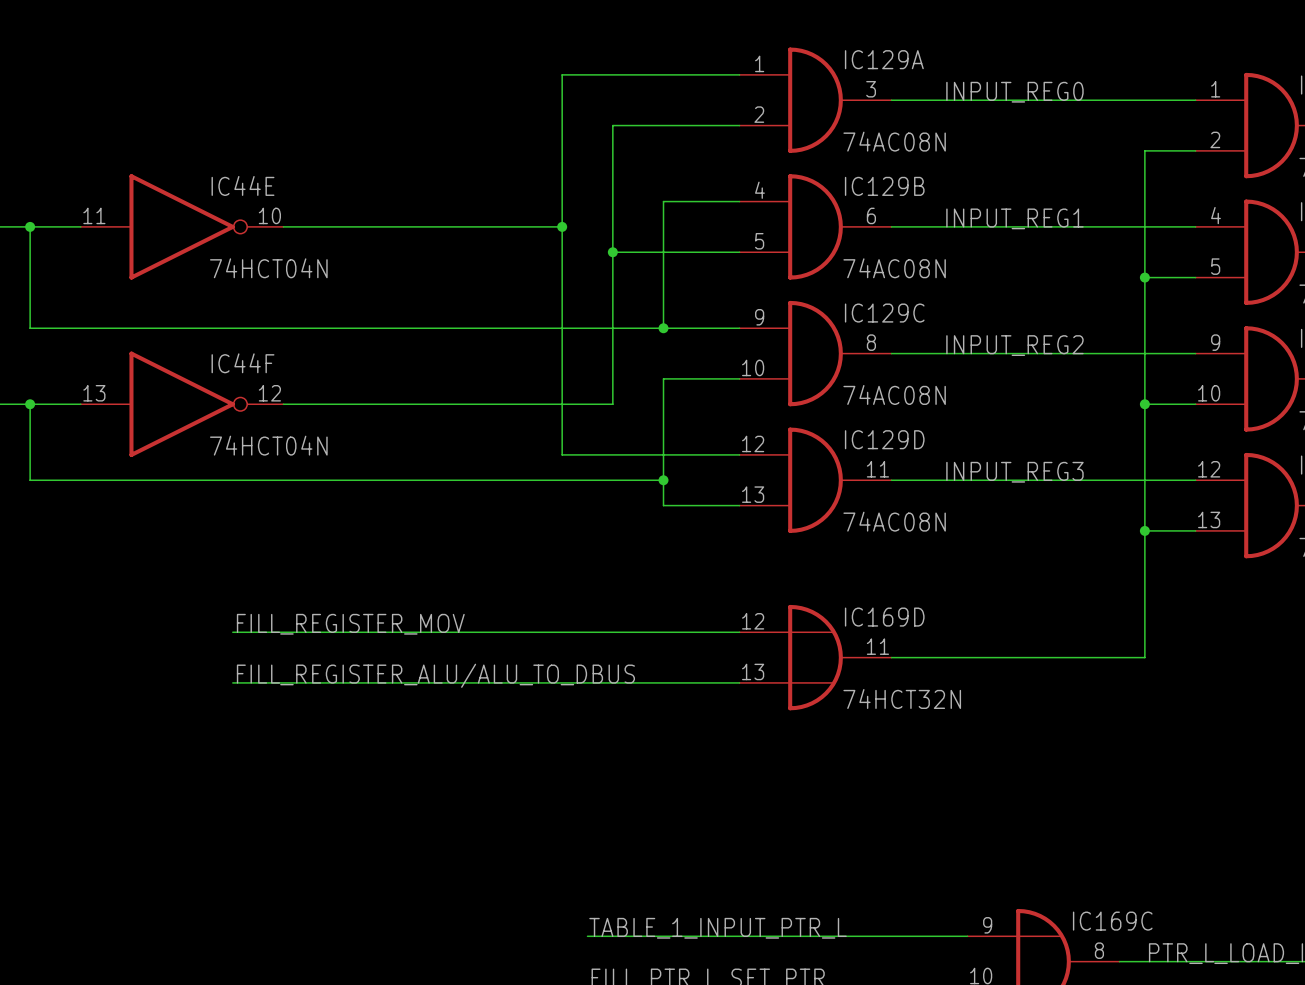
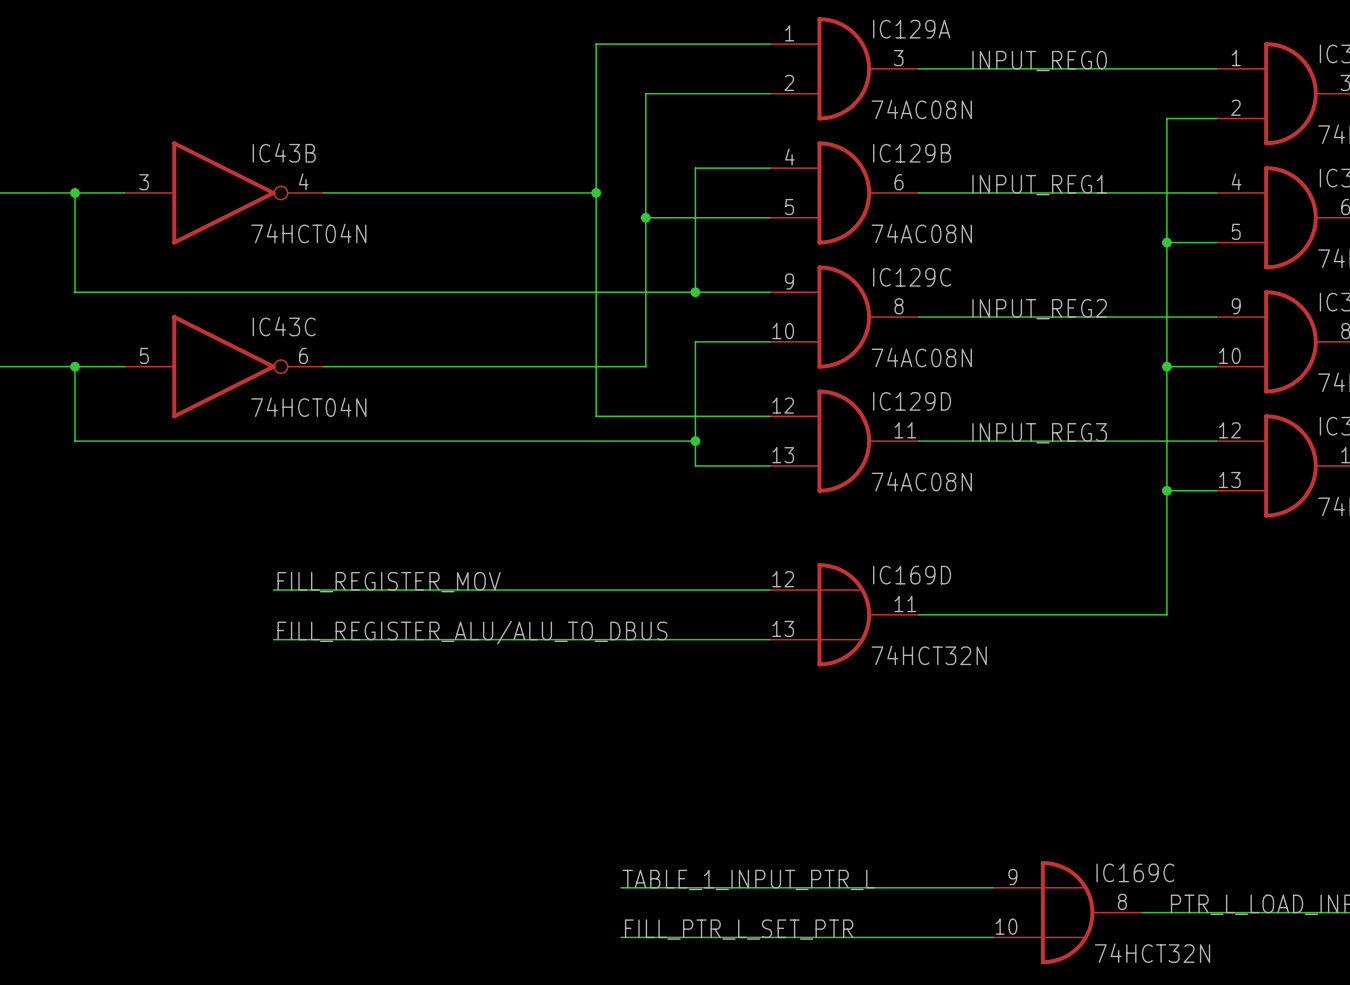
IC44E name: IC44E (242, 185) -> IC43B (284, 152)
IC44E pin number: 11 (94, 215) -> 3 (144, 182)
IC44E pin number: 10 (269, 215) -> 4 (303, 181)
IC44F name: IC44F (242, 363) -> IC43C (284, 326)
IC44F pin number: 13 (94, 393) -> 5 (144, 355)
IC44F pin number: 12 (269, 393) -> 6 (303, 355)

